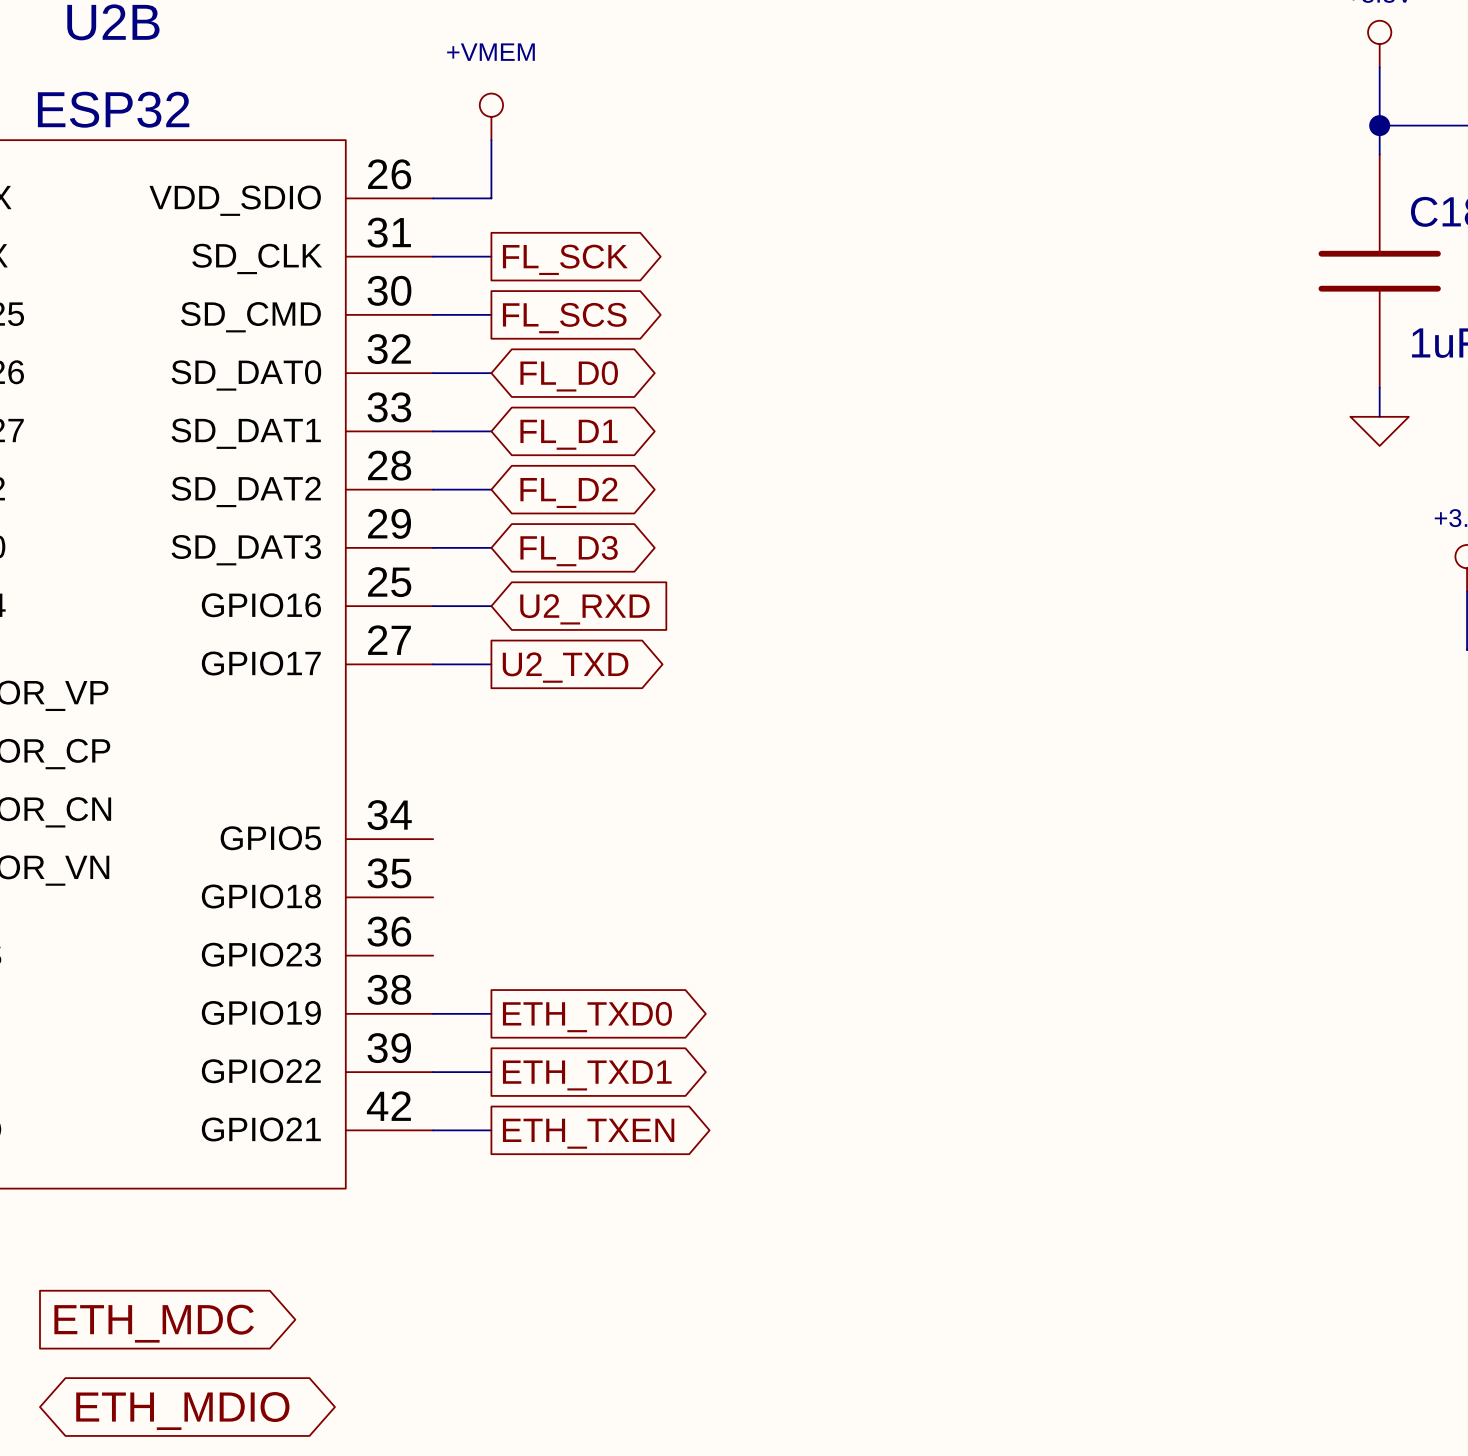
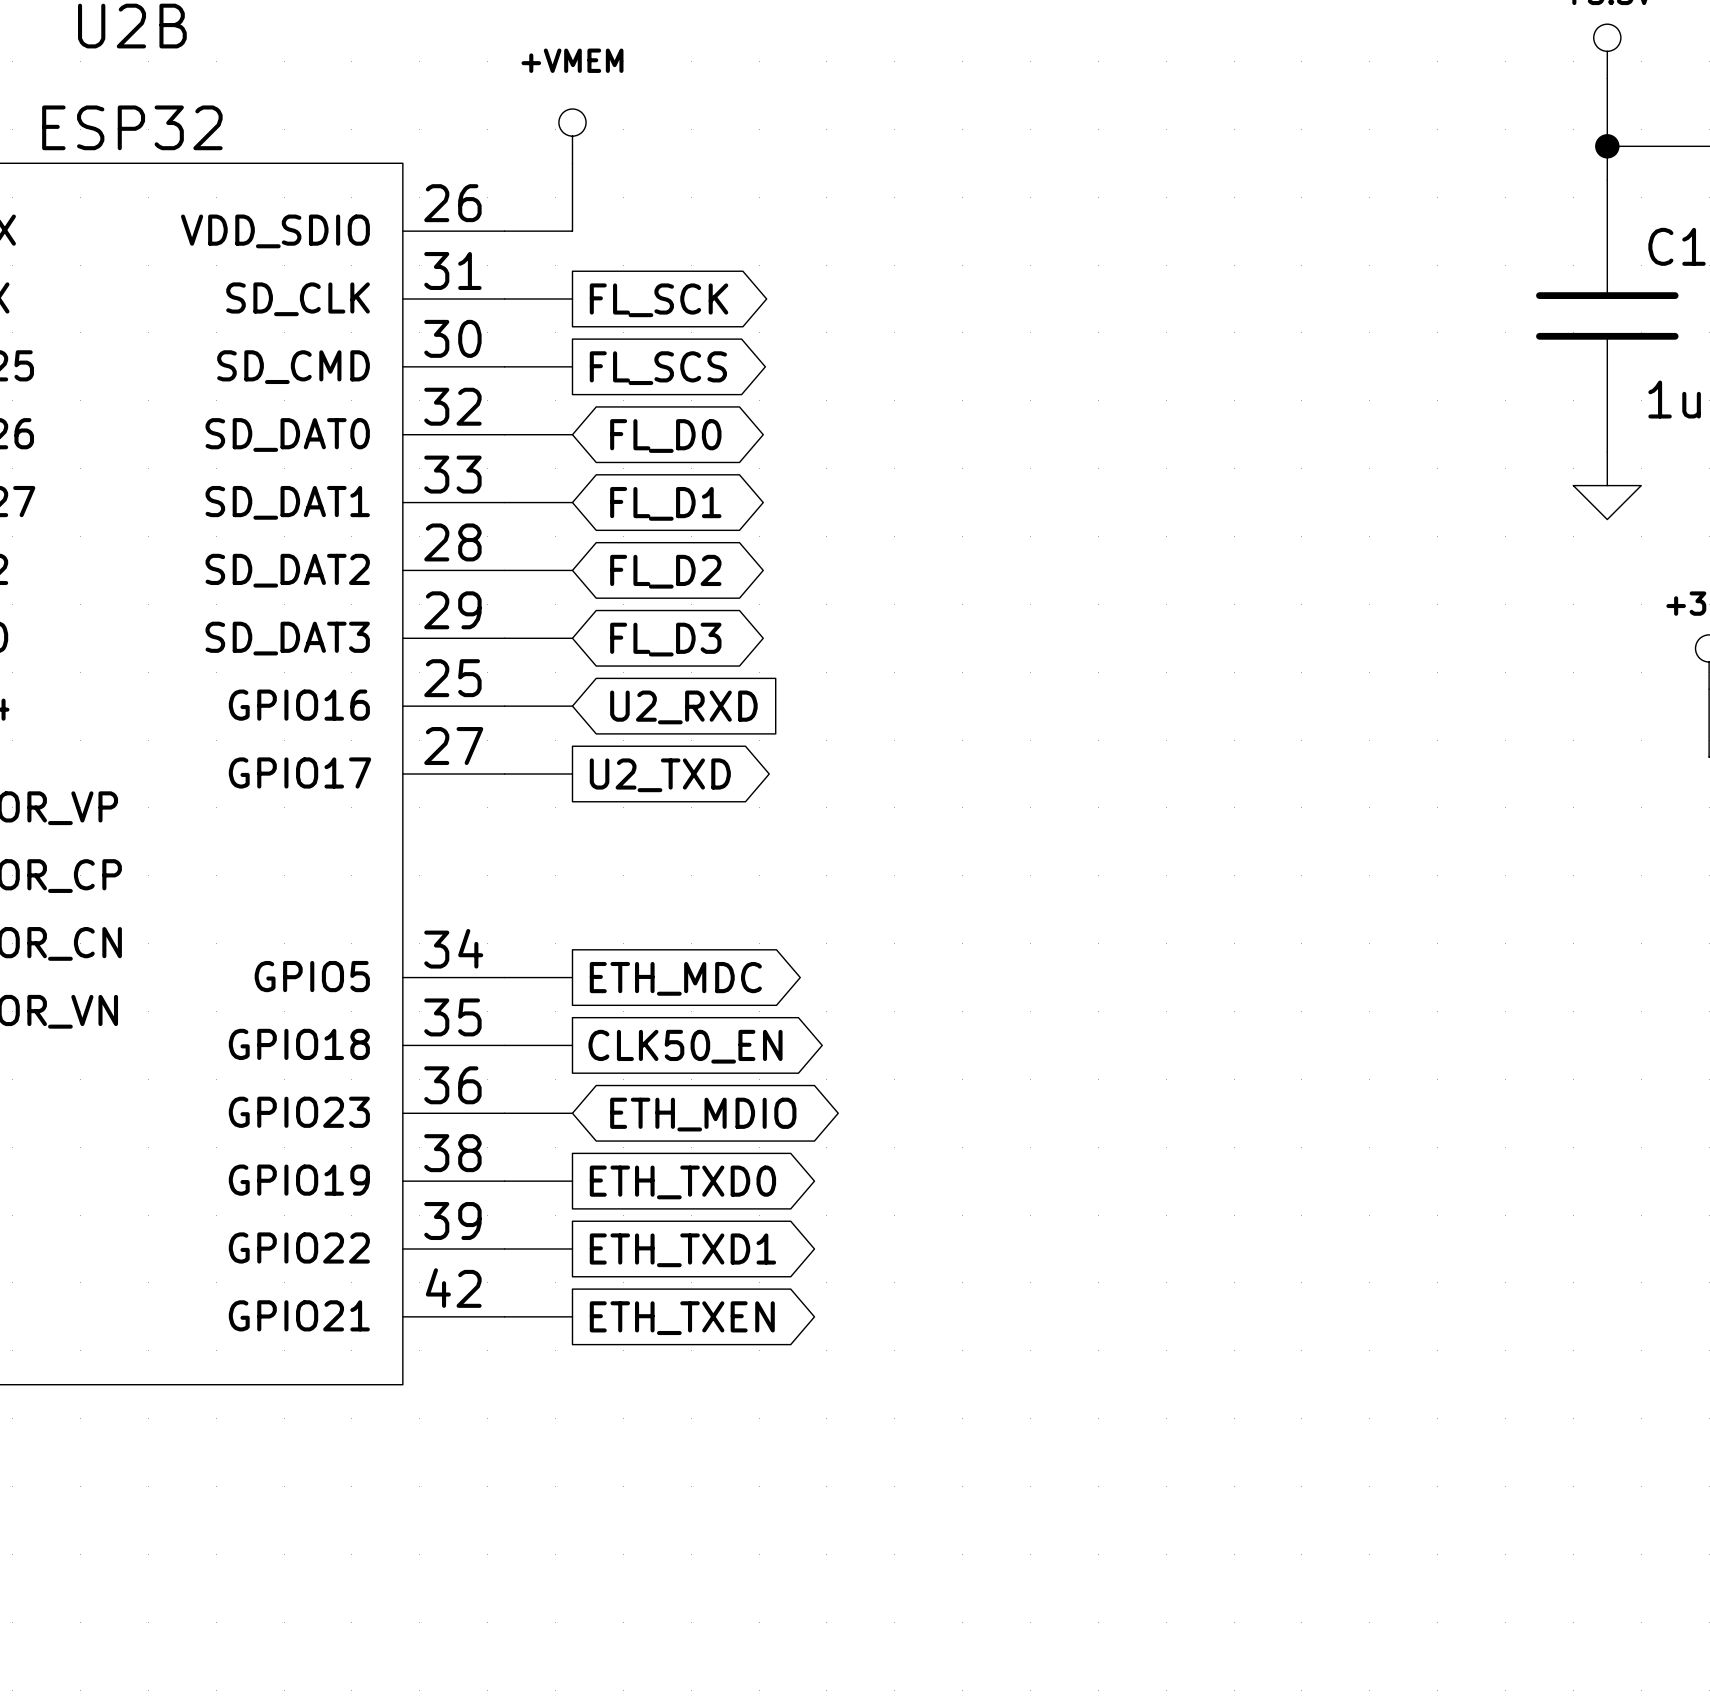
wire: none -> (504, 977) (572, 977)
global label: none -> ETH_MDC (675, 978)
wire: none -> (504, 1045) (572, 1045)
global label: none -> CLK50_EN (685, 1046)
wire: none -> (504, 1113) (572, 1113)
global label: none -> ETH_MDIO (703, 1114)
global label: ETH_MDC (154, 1323) -> none
global label: ETH_MDIO (182, 1411) -> none

